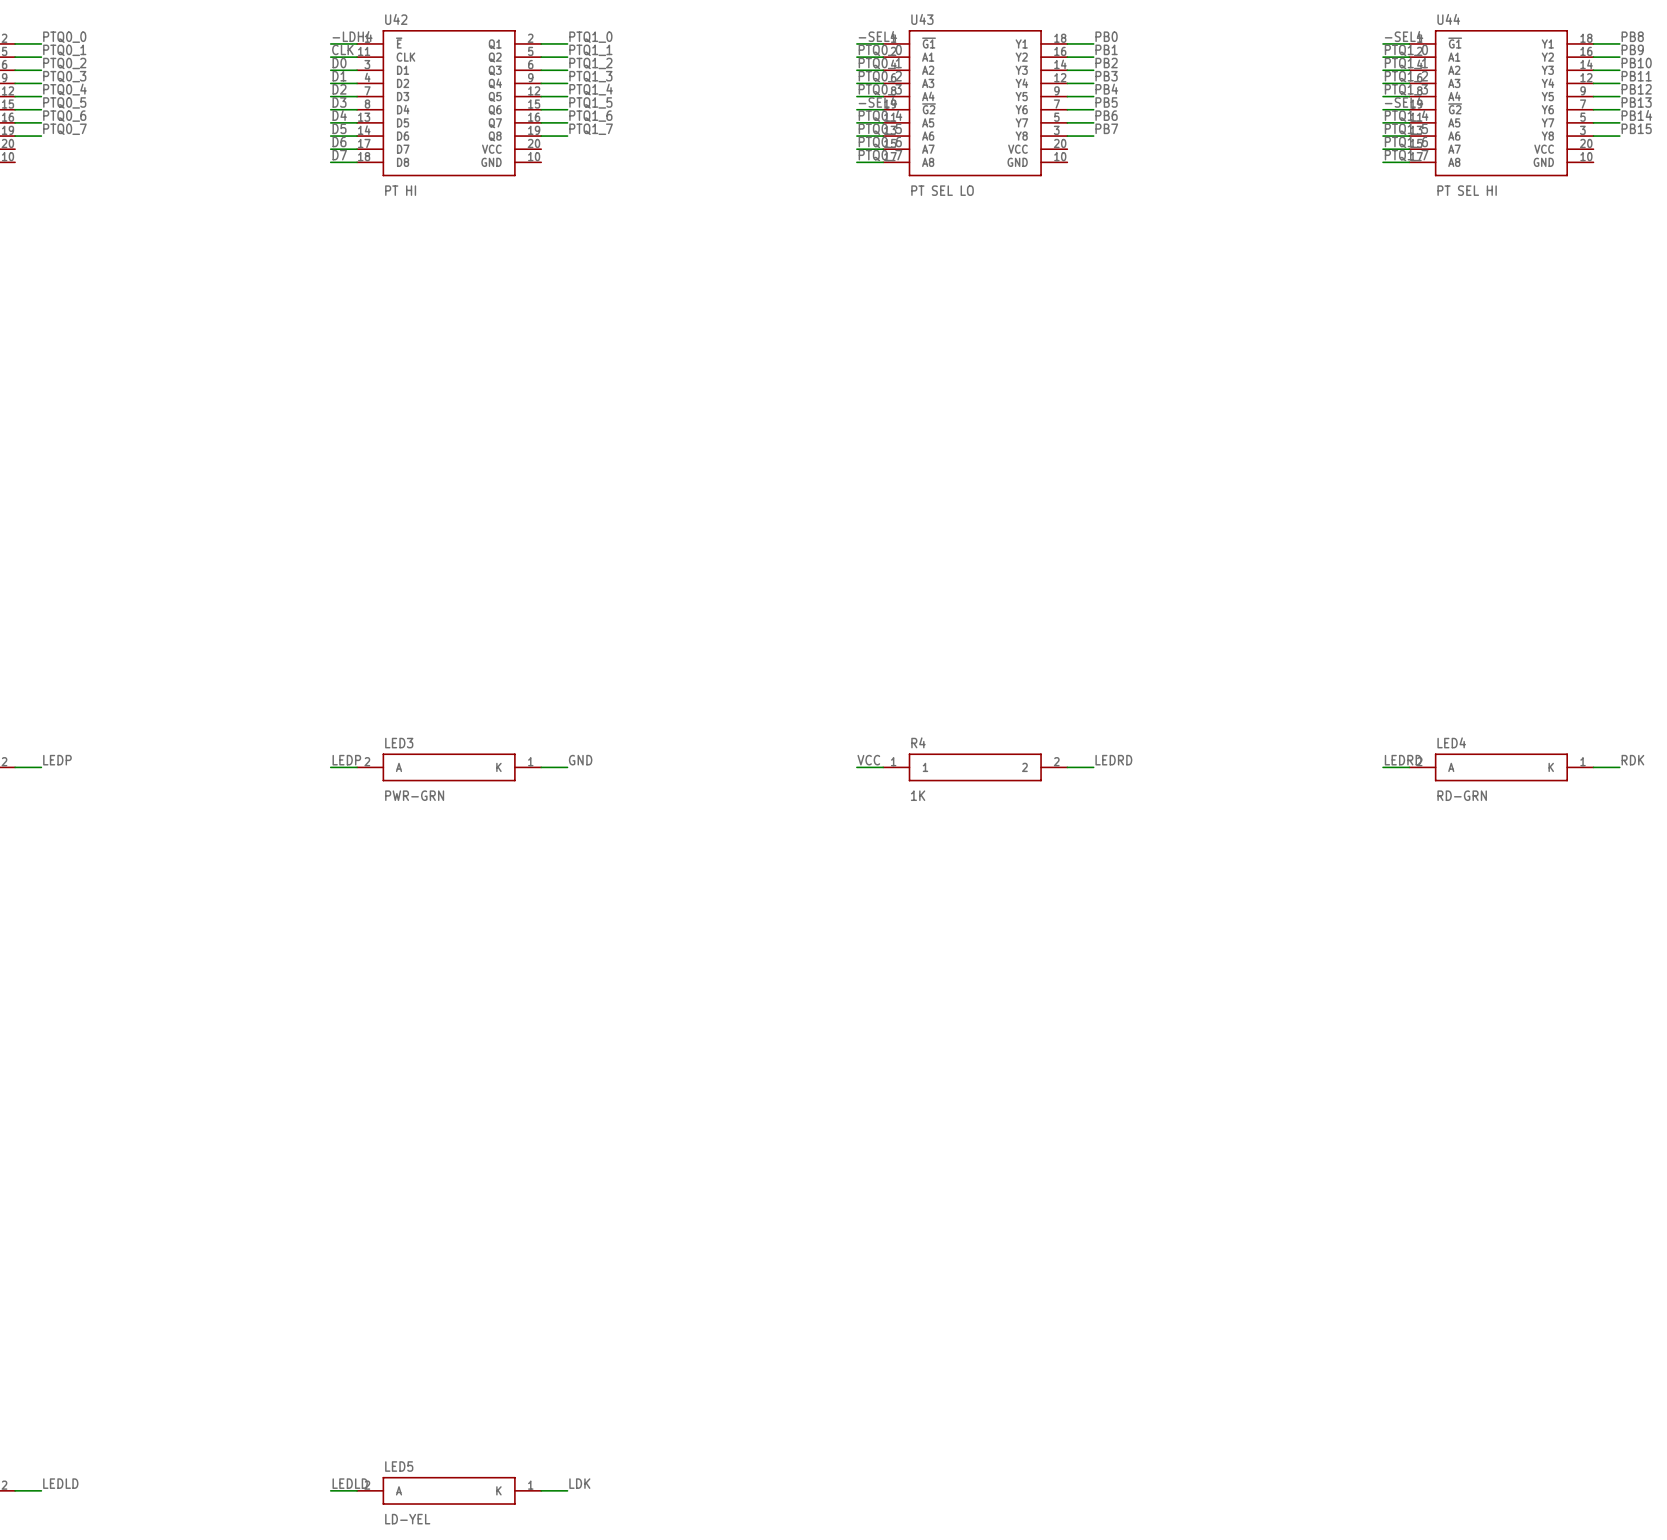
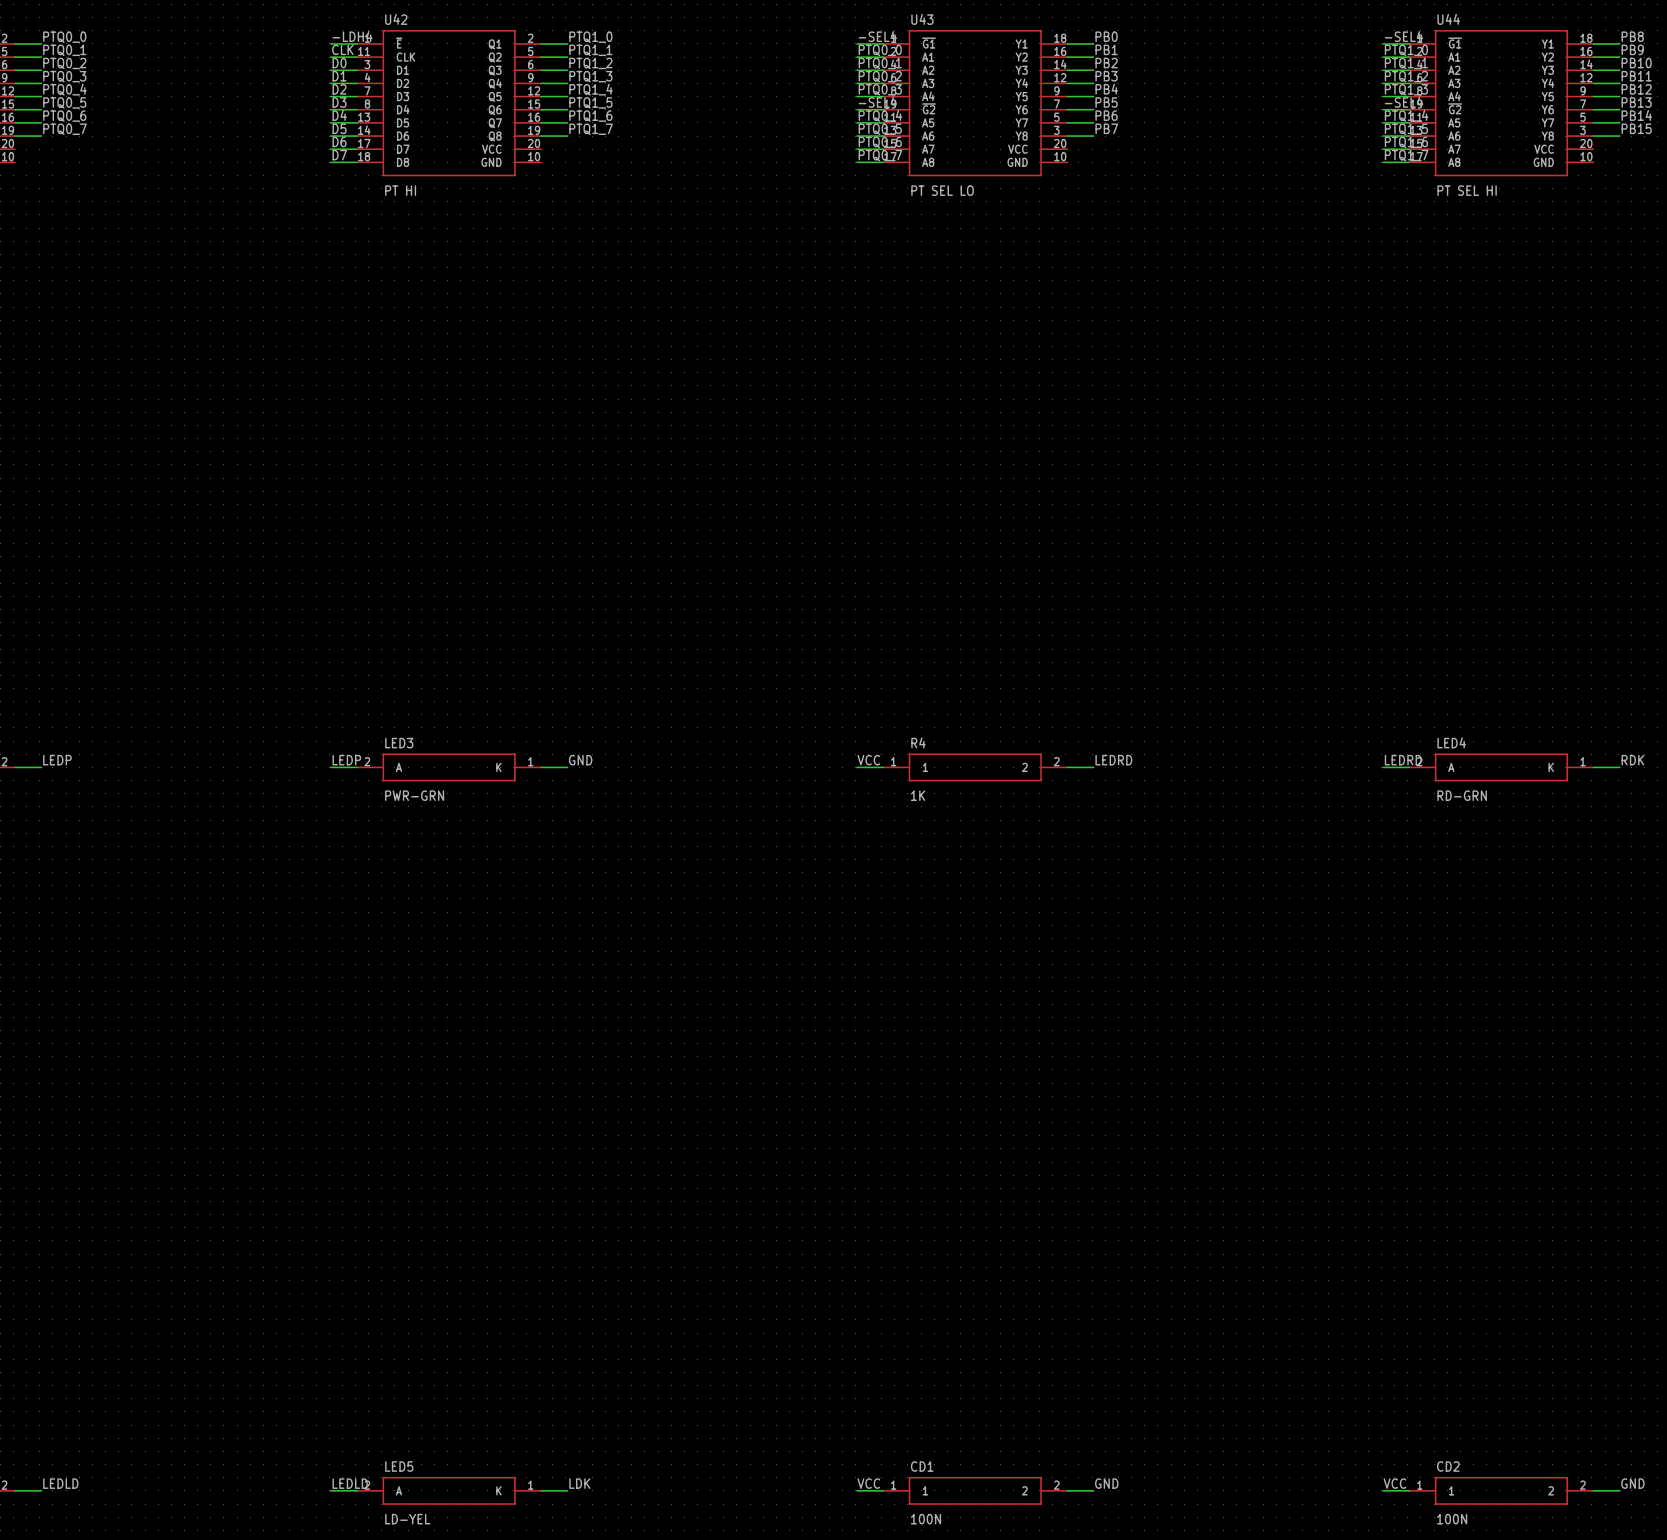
label: none -> VCC (868, 1483)
label: none -> GND (1106, 1483)
label: none -> VCC (1394, 1483)
label: none -> GND (1632, 1483)
wire: none -> (856, 1490) (883, 1490)
CD1: none -> 100N (975, 1490)
wire: none -> (1067, 1490) (1093, 1490)
wire: none -> (1383, 1490) (1409, 1490)
CD2: none -> 100N (1501, 1490)
wire: none -> (1593, 1490) (1619, 1490)

